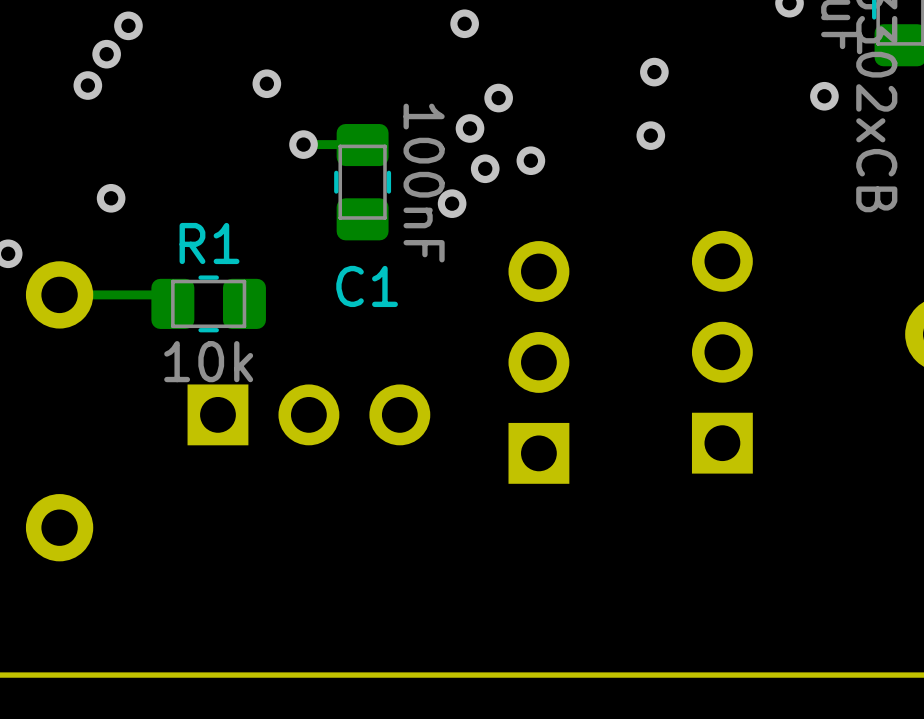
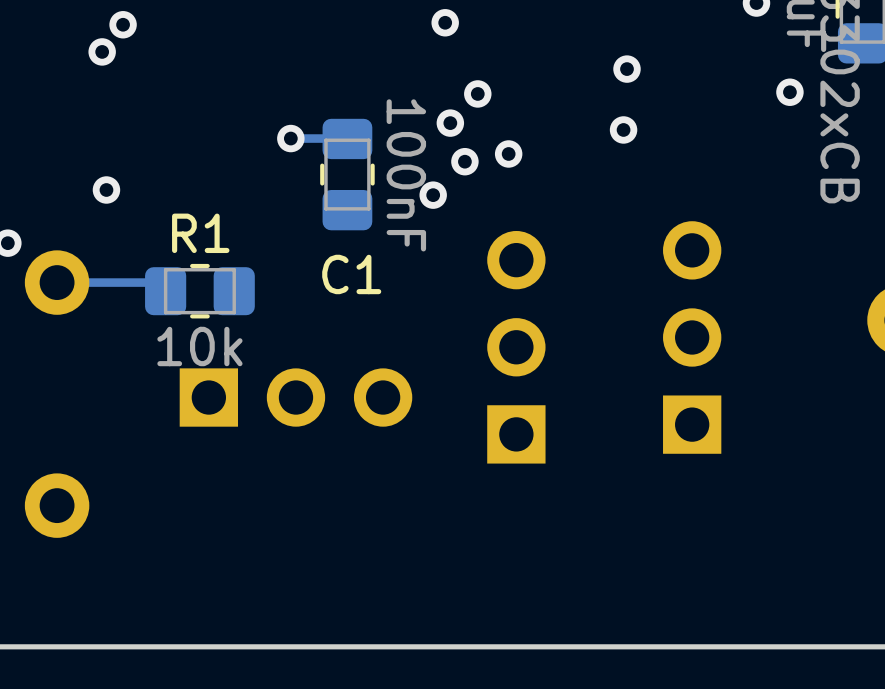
via: (266, 83) -> none
via: (87, 85) -> none

